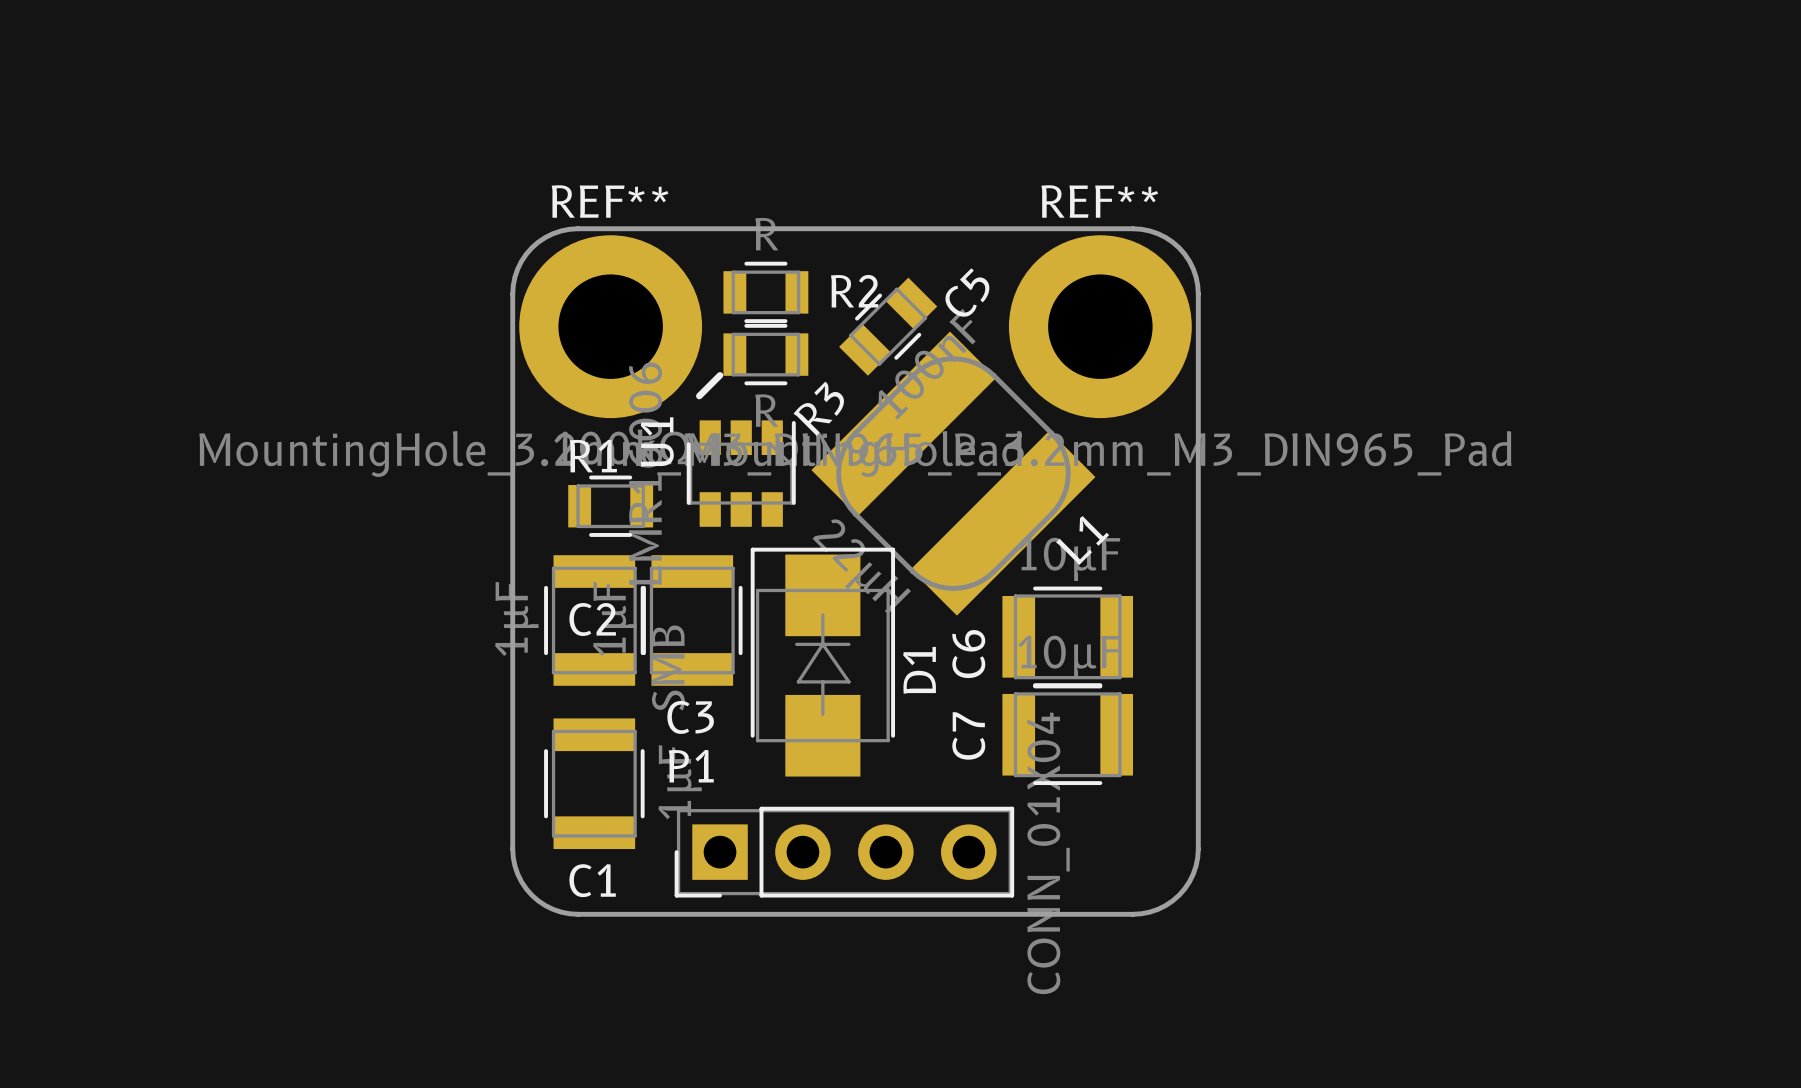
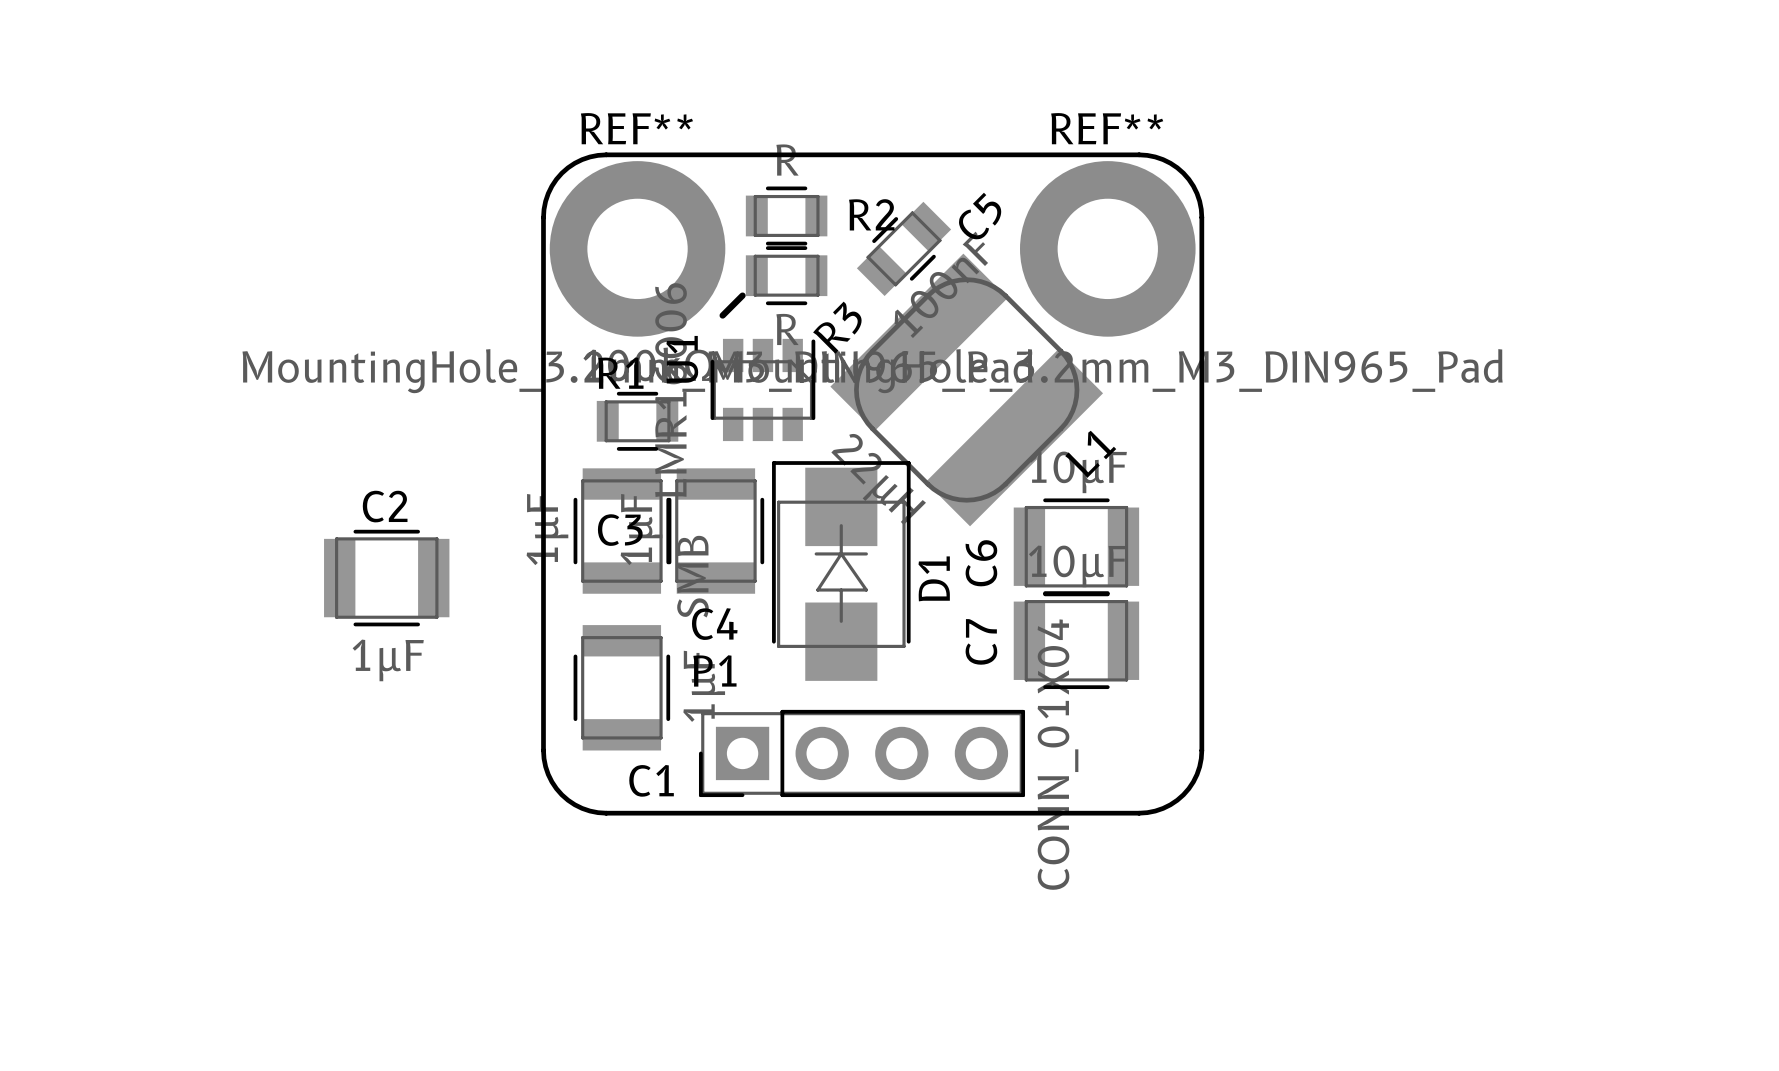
C2 name: C2 (592, 619) -> C3 (620, 530)
C2: none -> 1µF (386, 578)
C3 name: C3 (690, 717) -> C4 (714, 624)
C1 name position: C1 (592, 880) -> C1 (651, 780)

